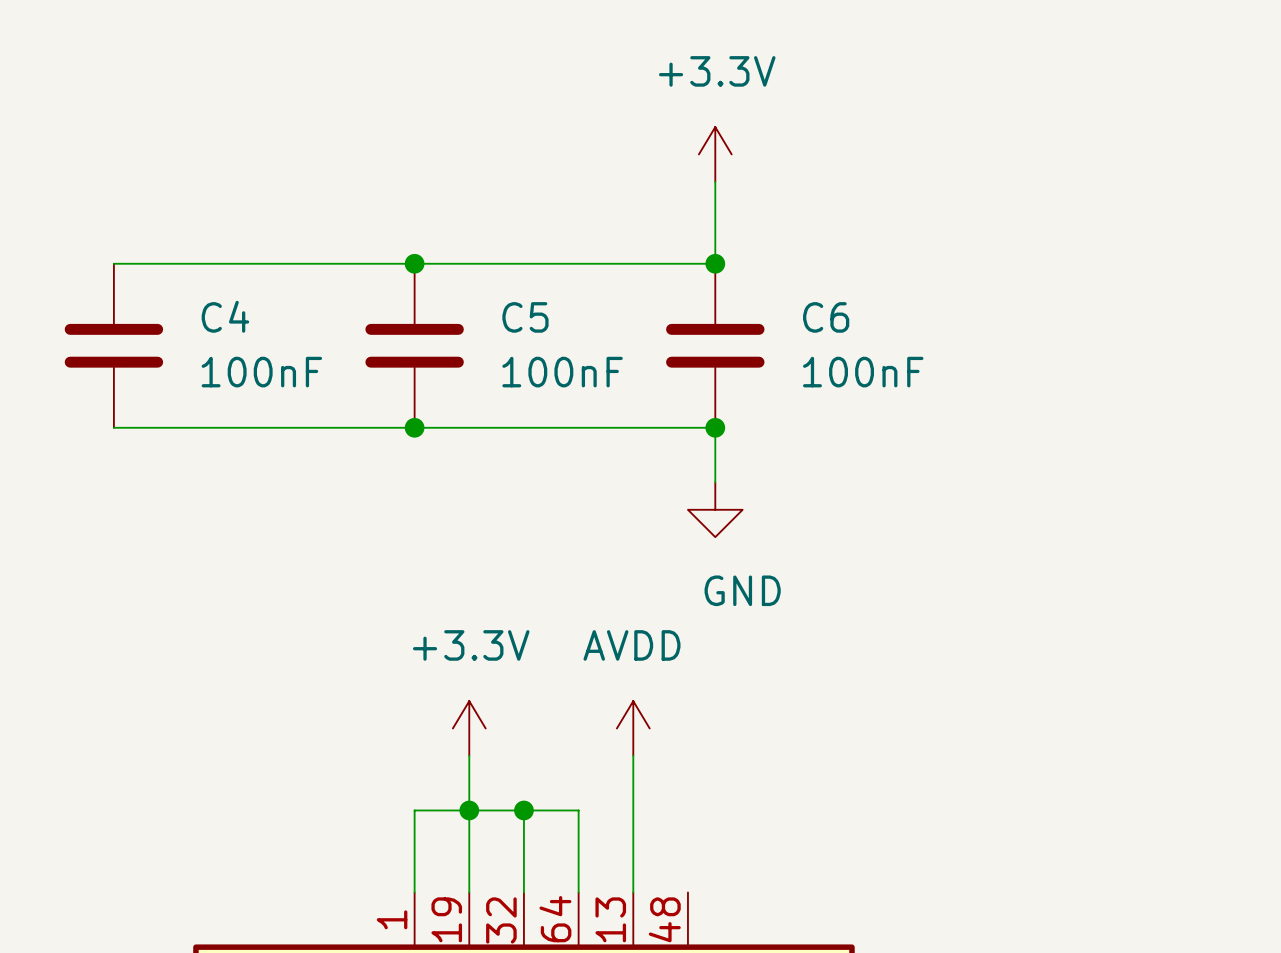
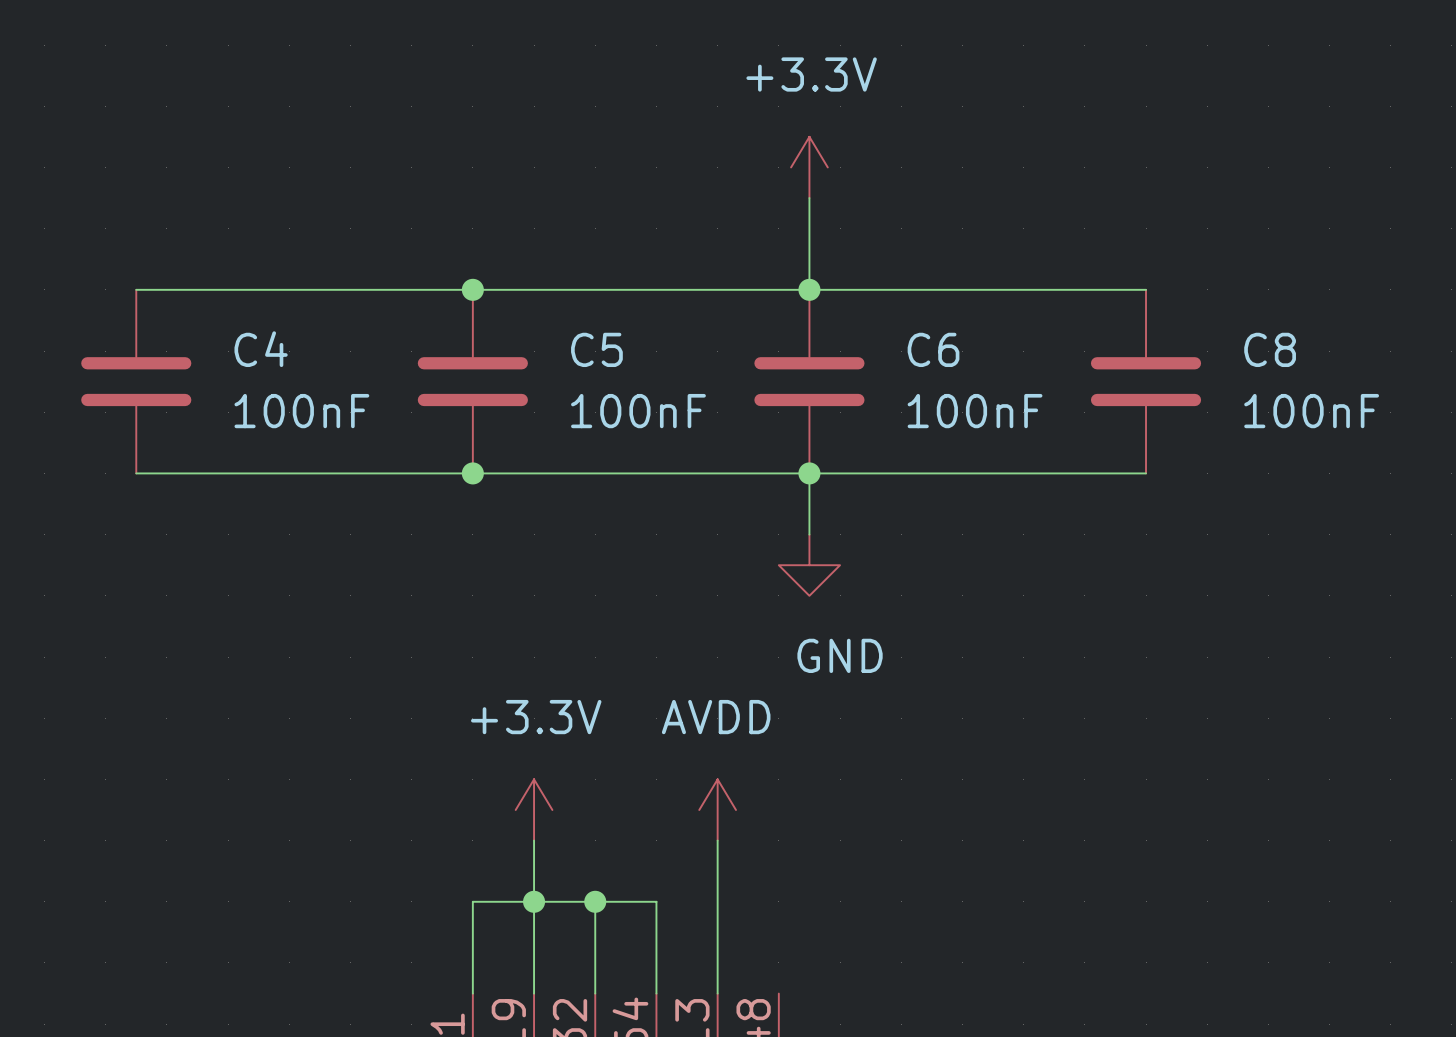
wire: none -> (809, 289) (1146, 289)
C8: none -> 100nF (1146, 381)
wire: none -> (809, 473) (1146, 473)

